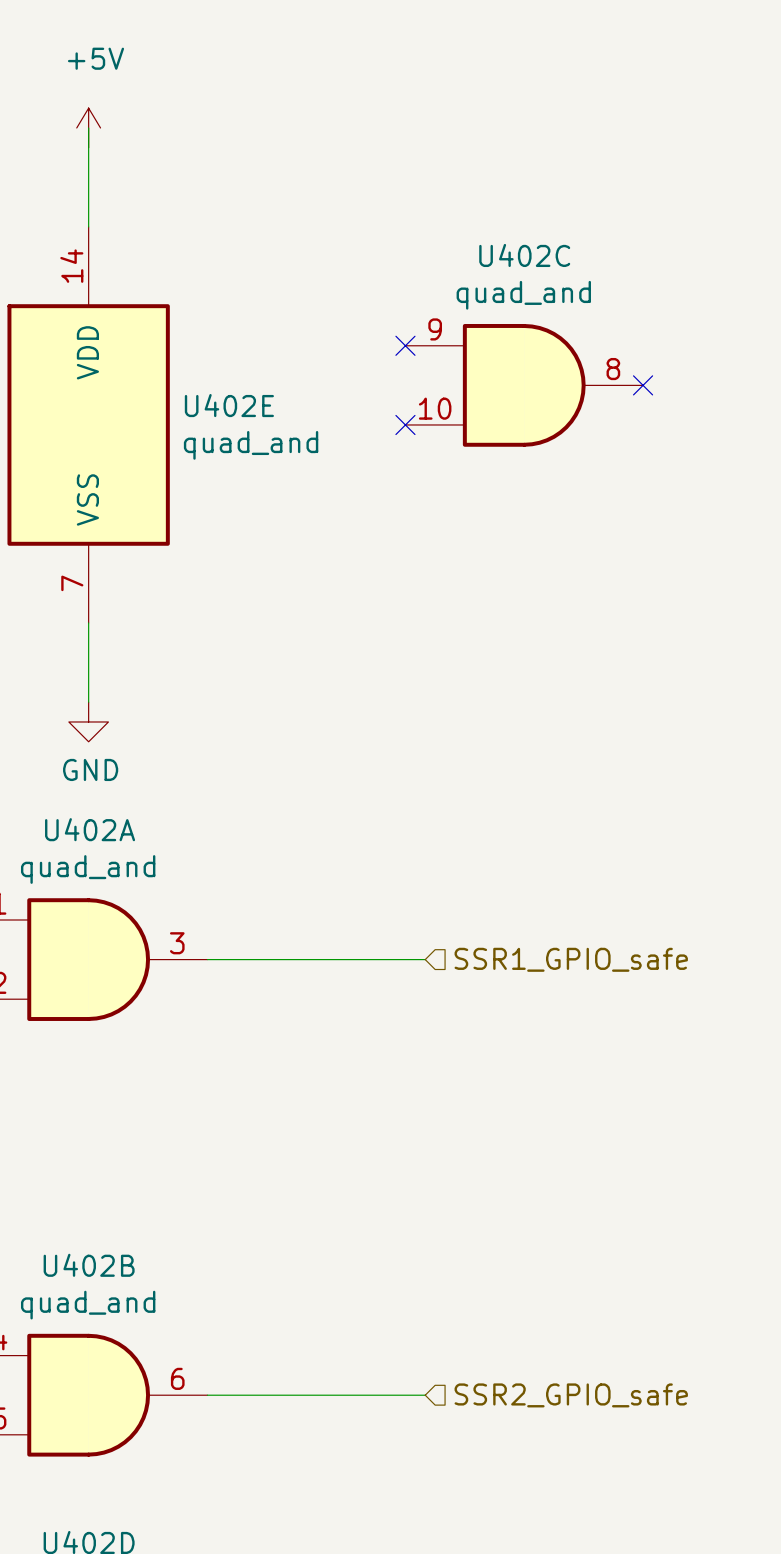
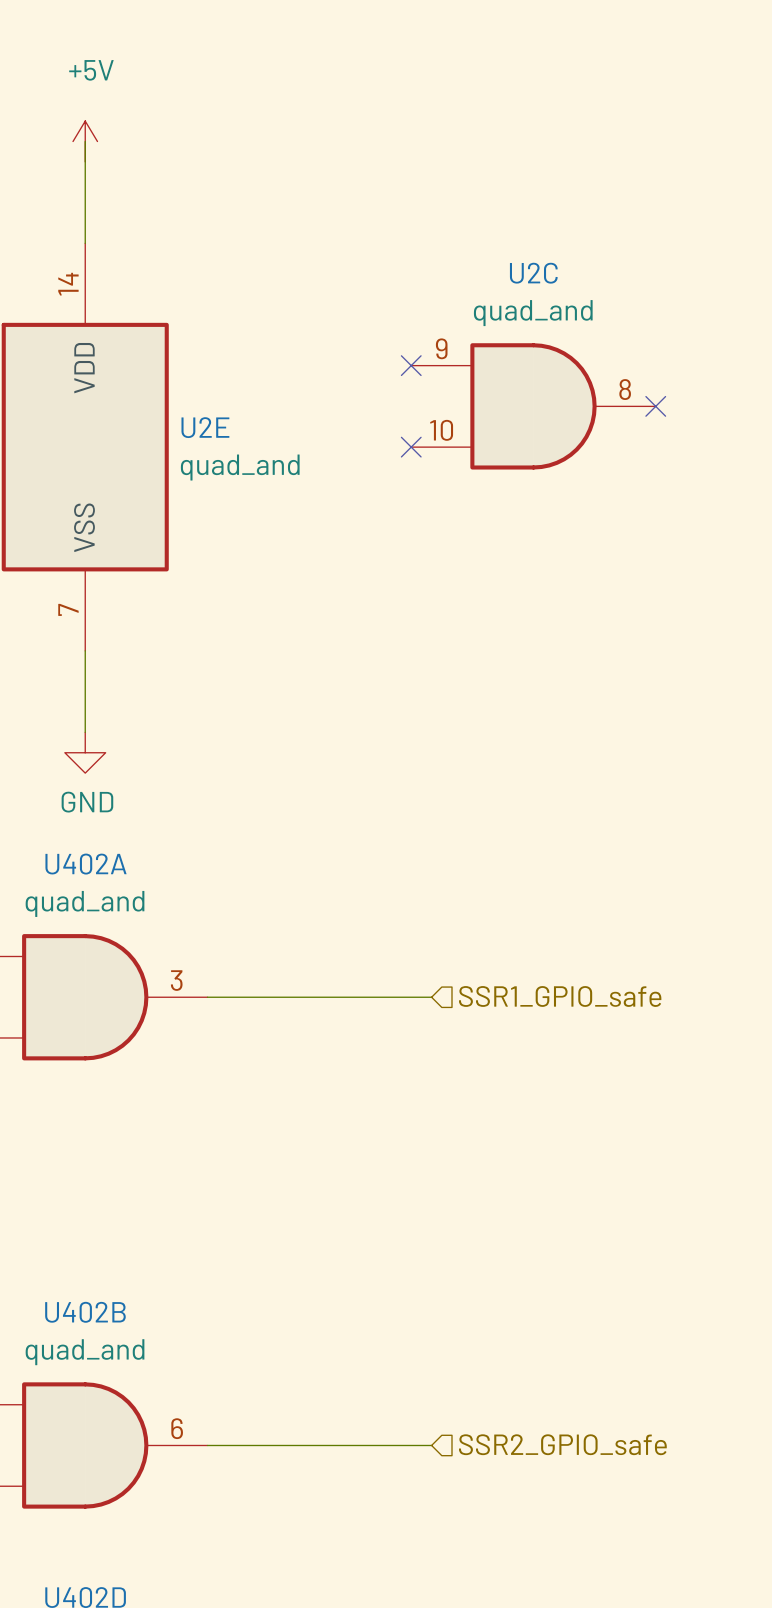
U402C name: U402C (524, 255) -> U2C (533, 273)
U402E name: U402E (229, 405) -> U2E (205, 427)

